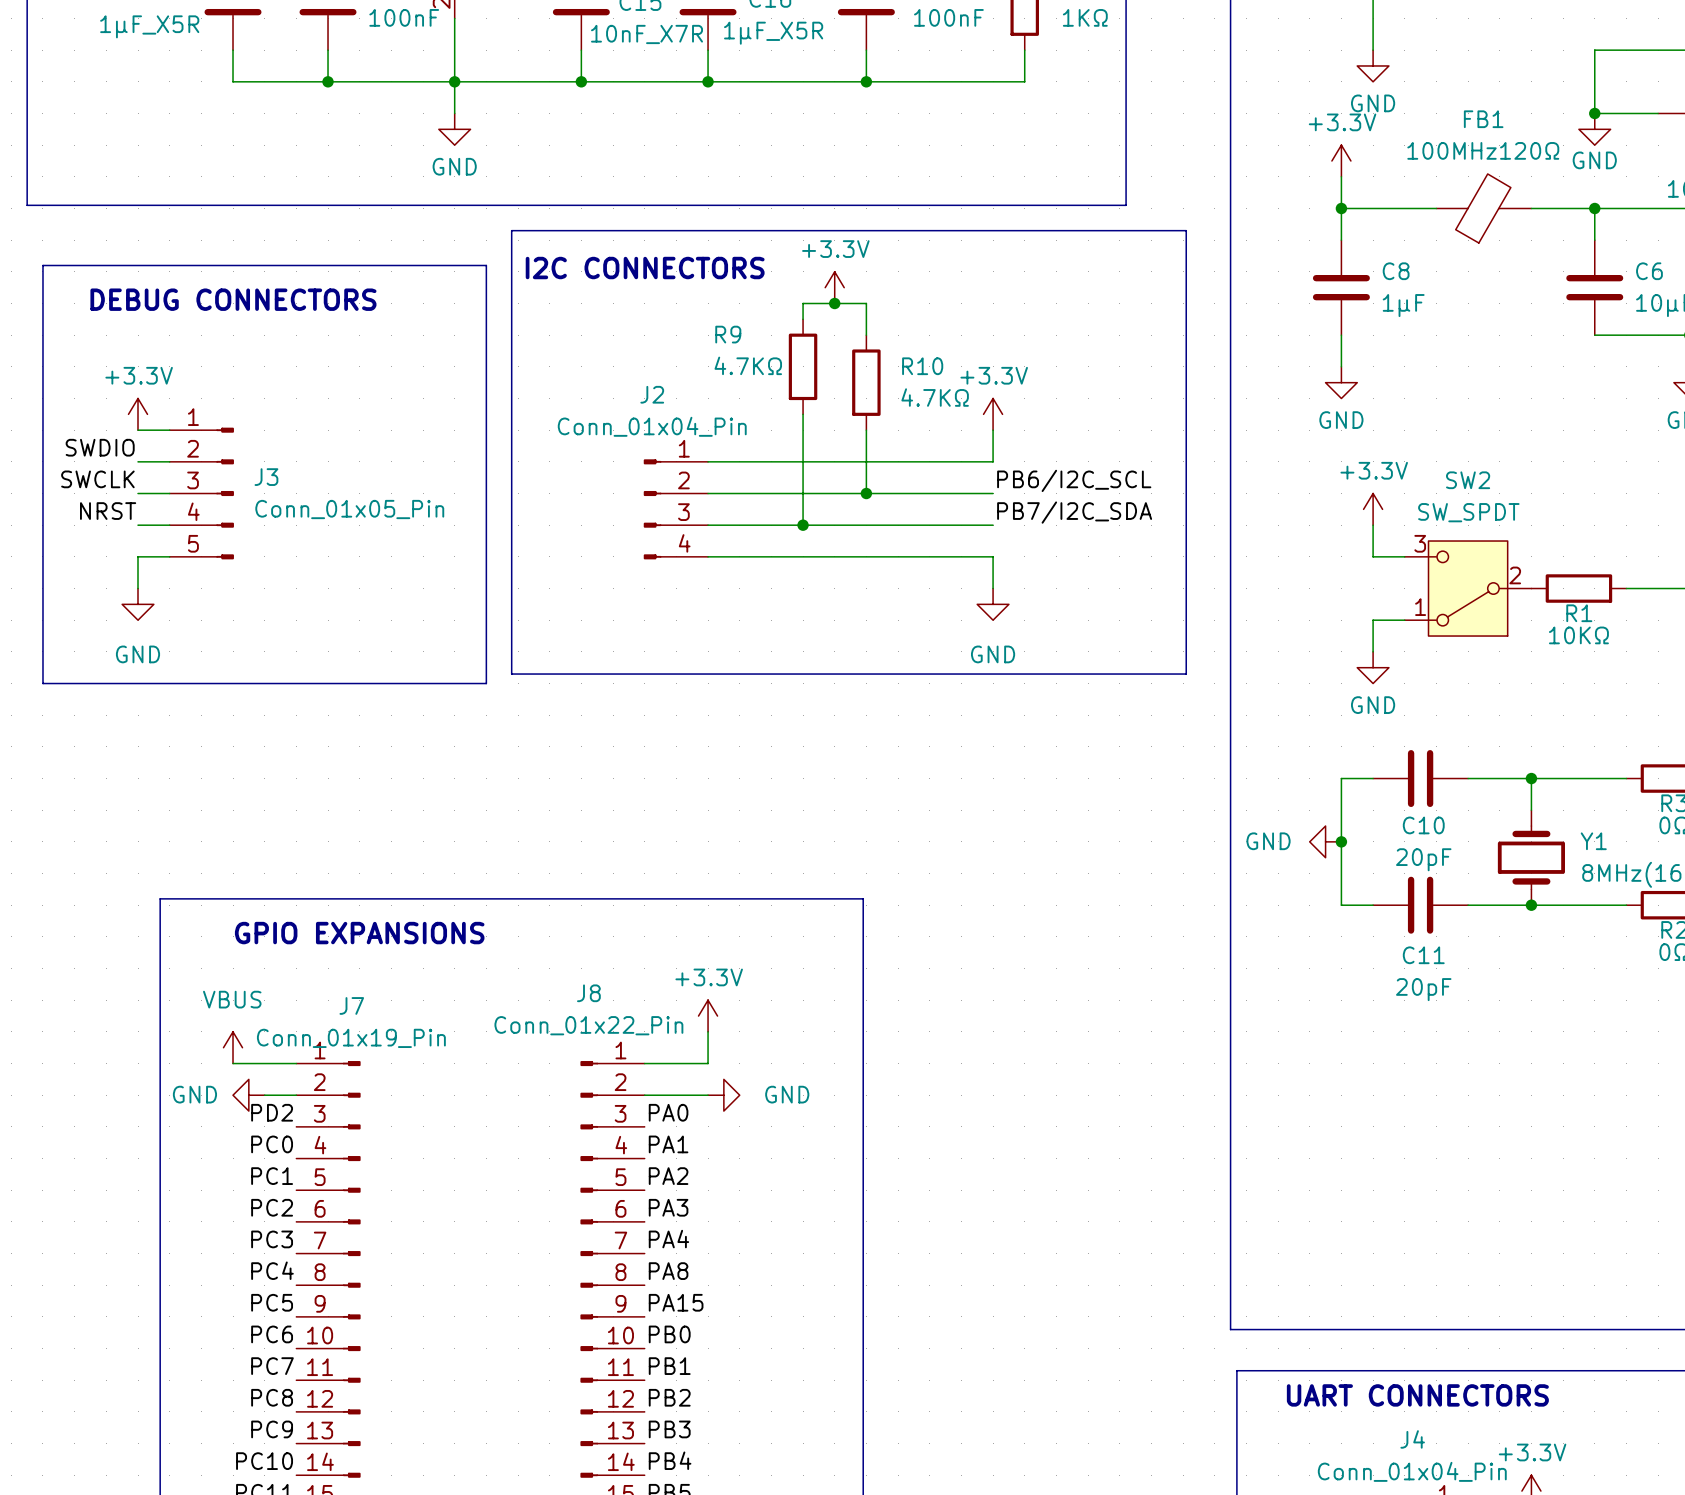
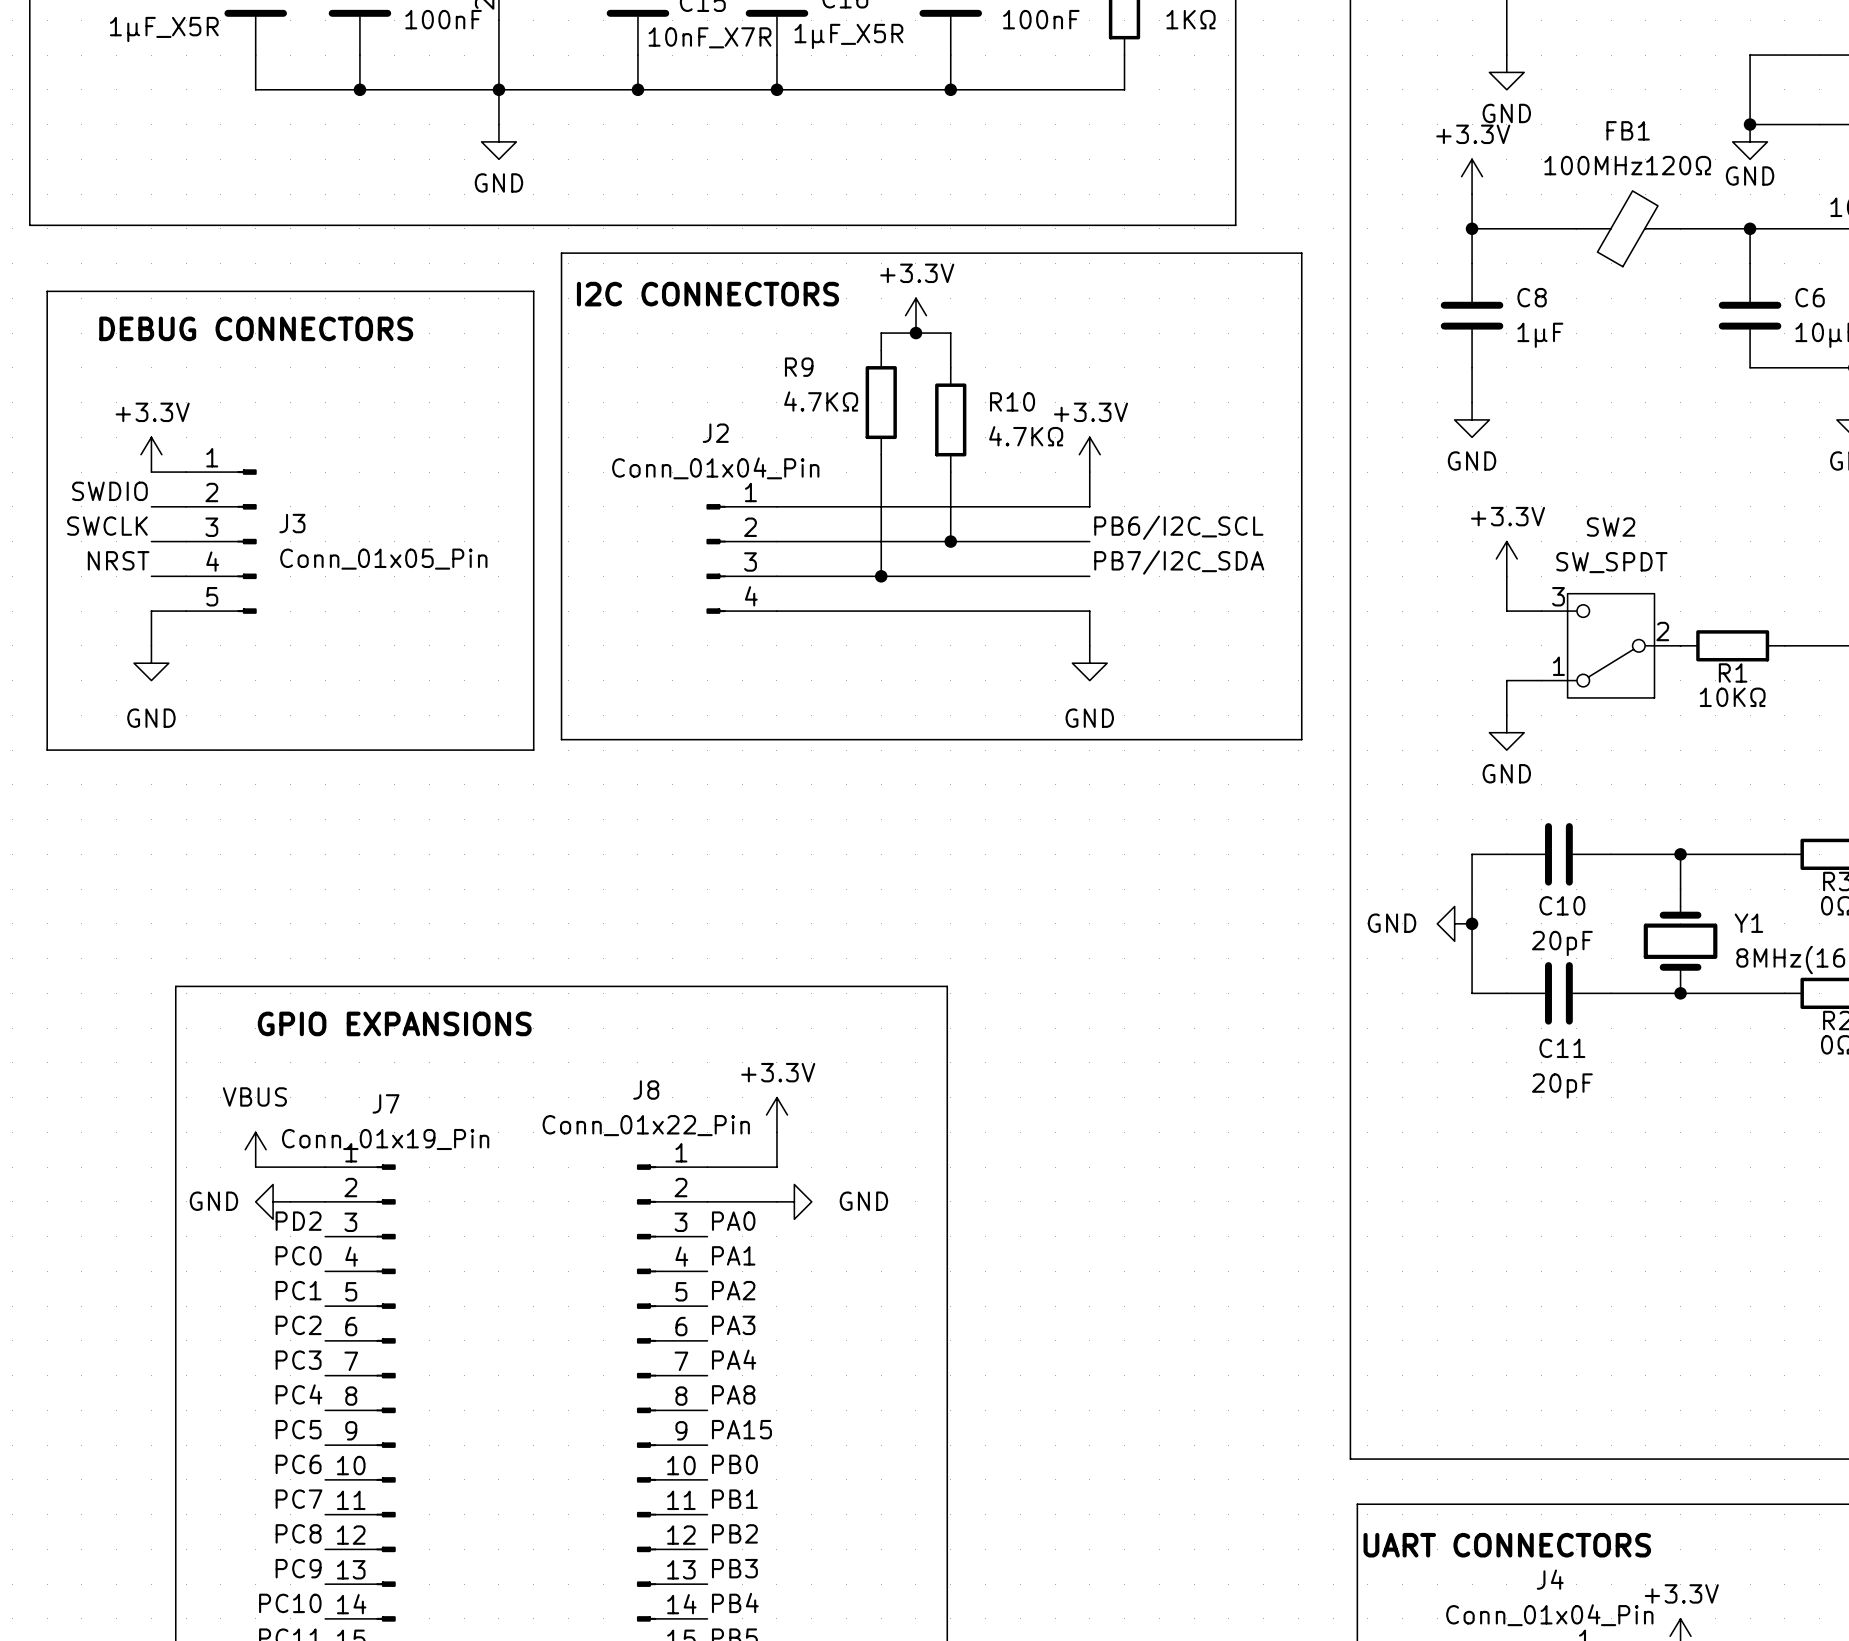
text position: UART CONNECTORS (1417, 1395) -> UART CONNECTORS (1507, 1545)

